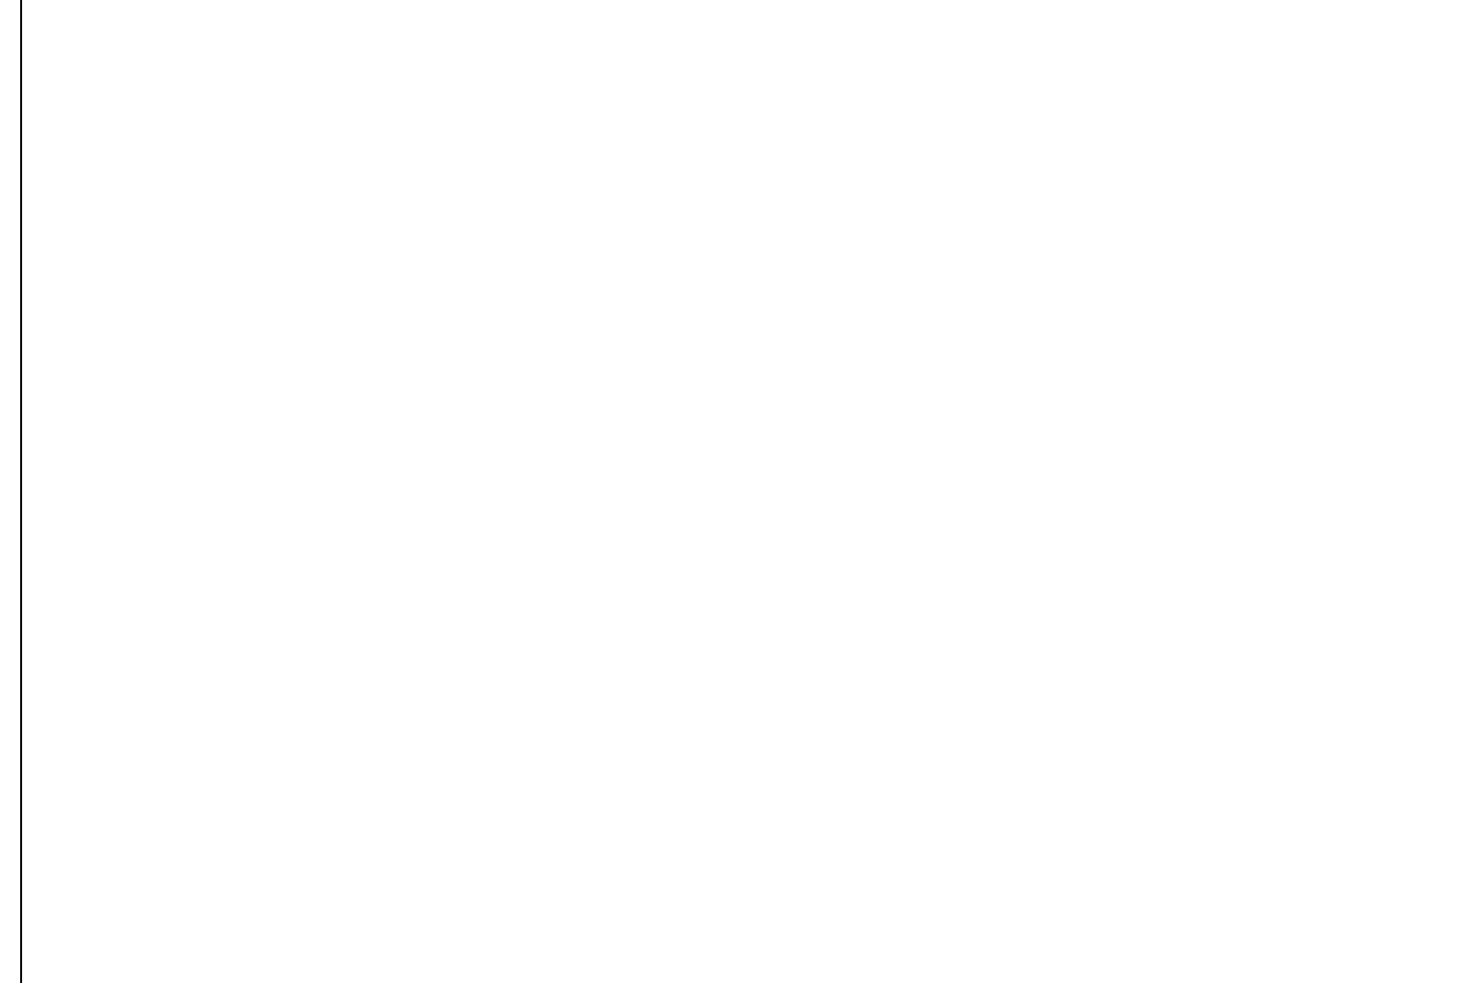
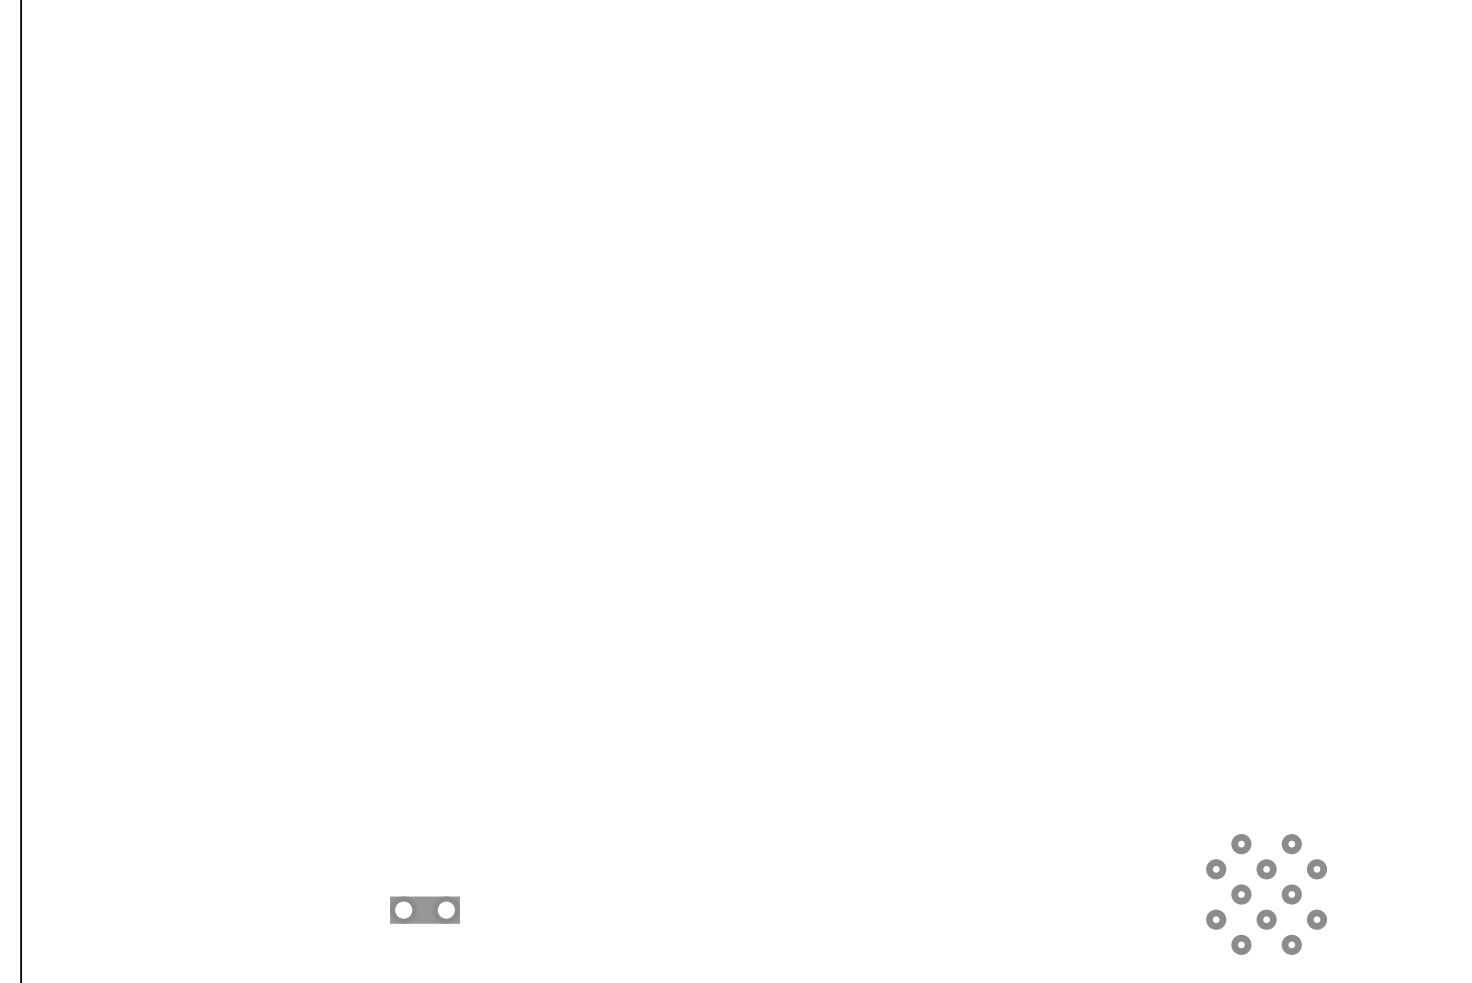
part: none -> (1266, 894)
part: none -> (425, 910)

